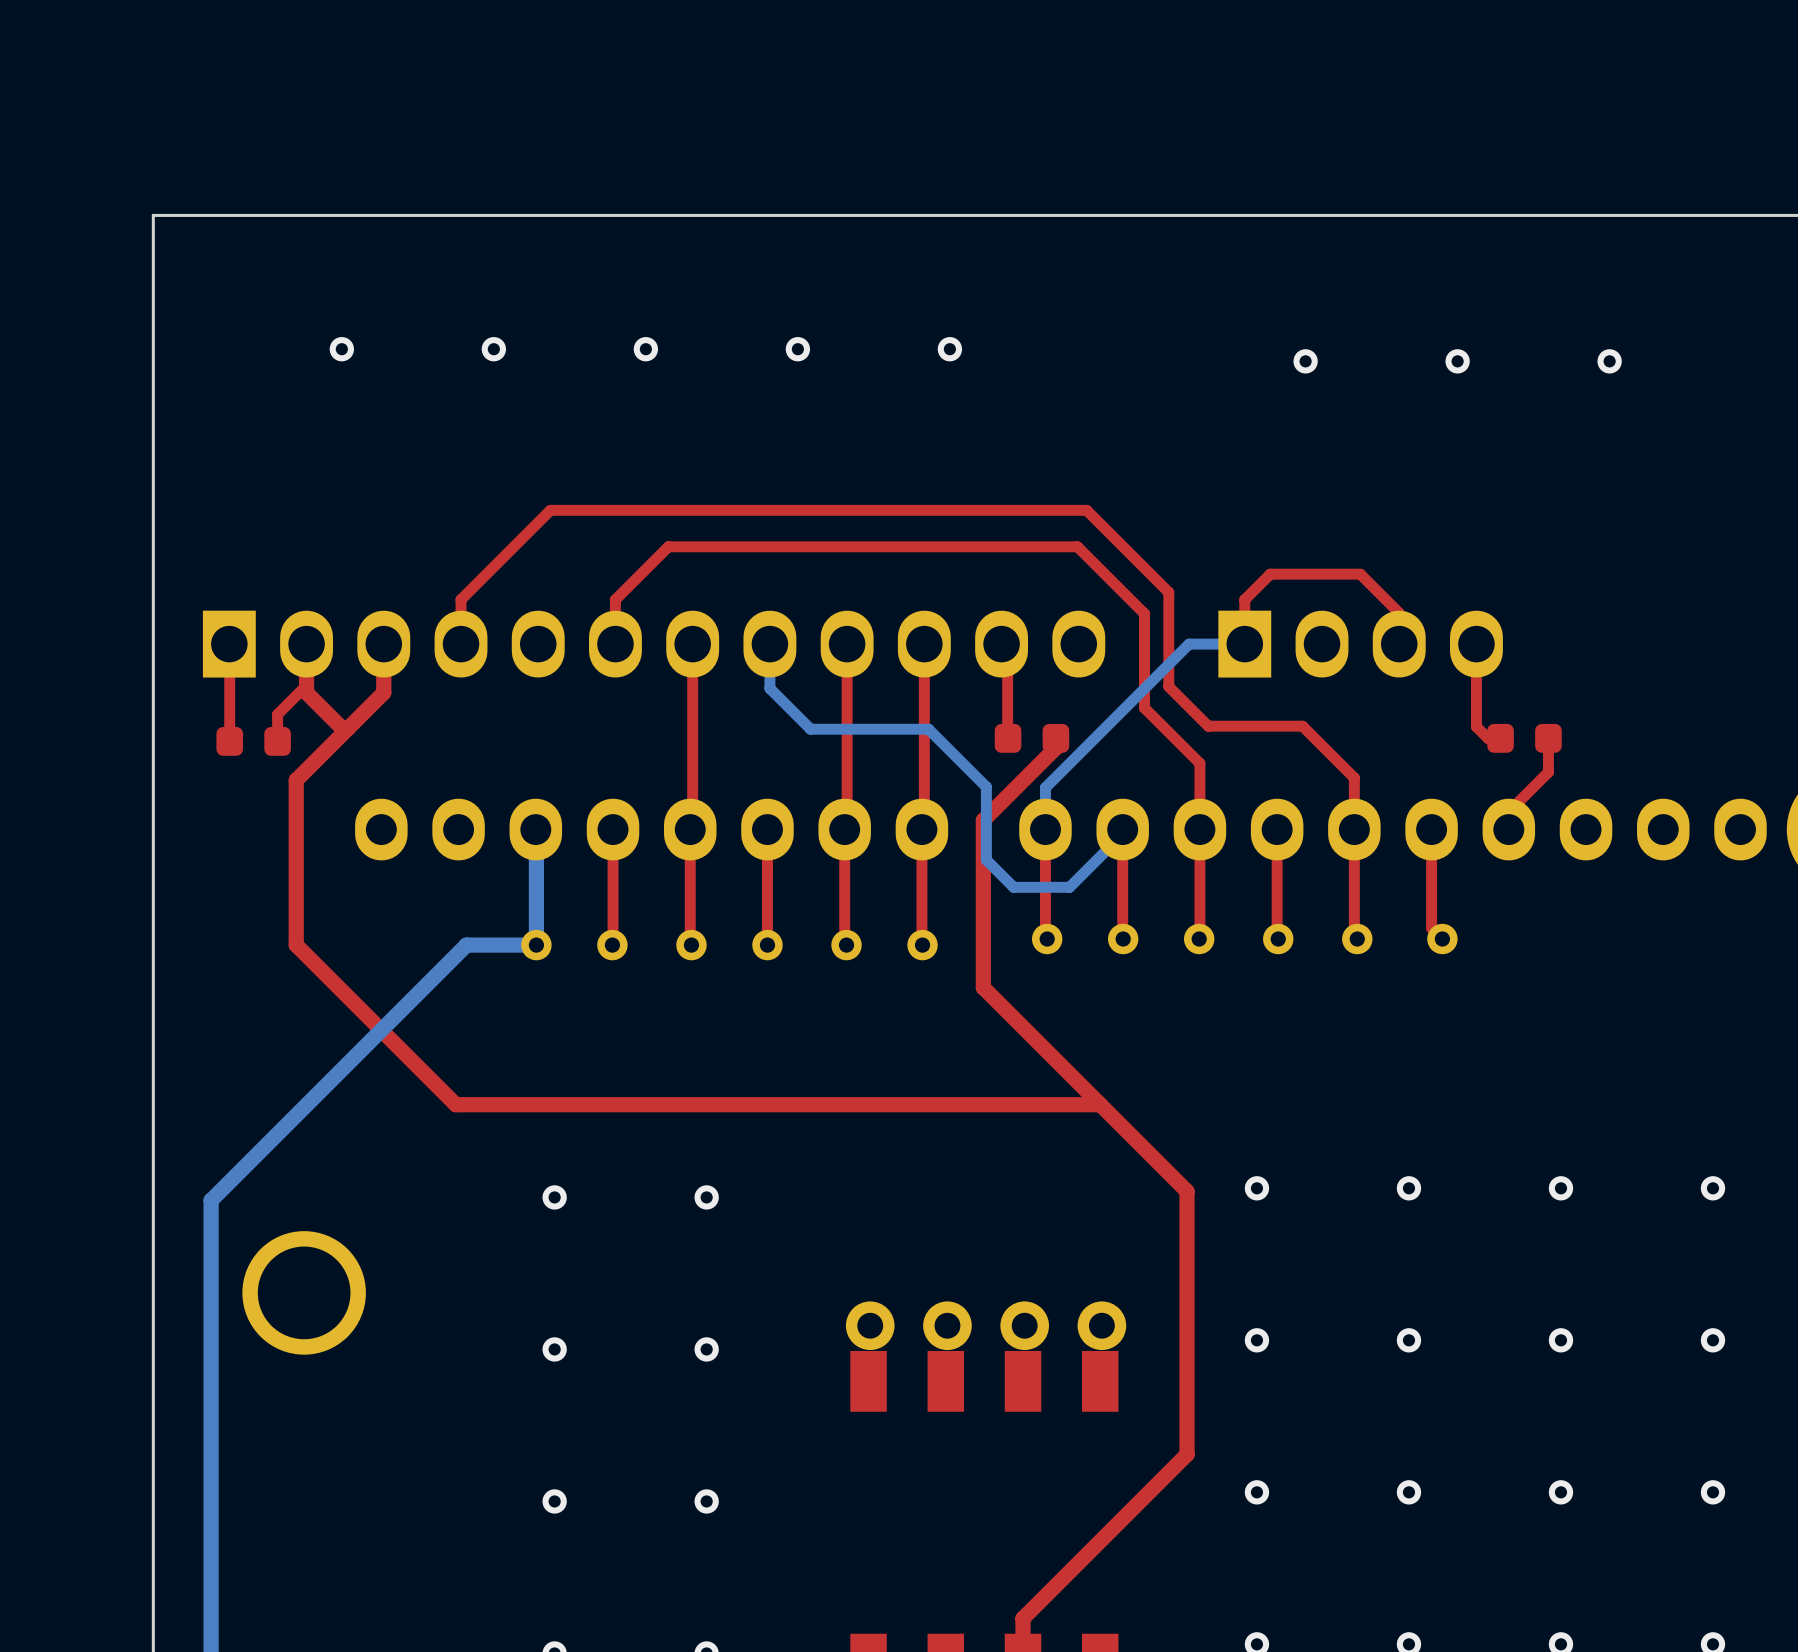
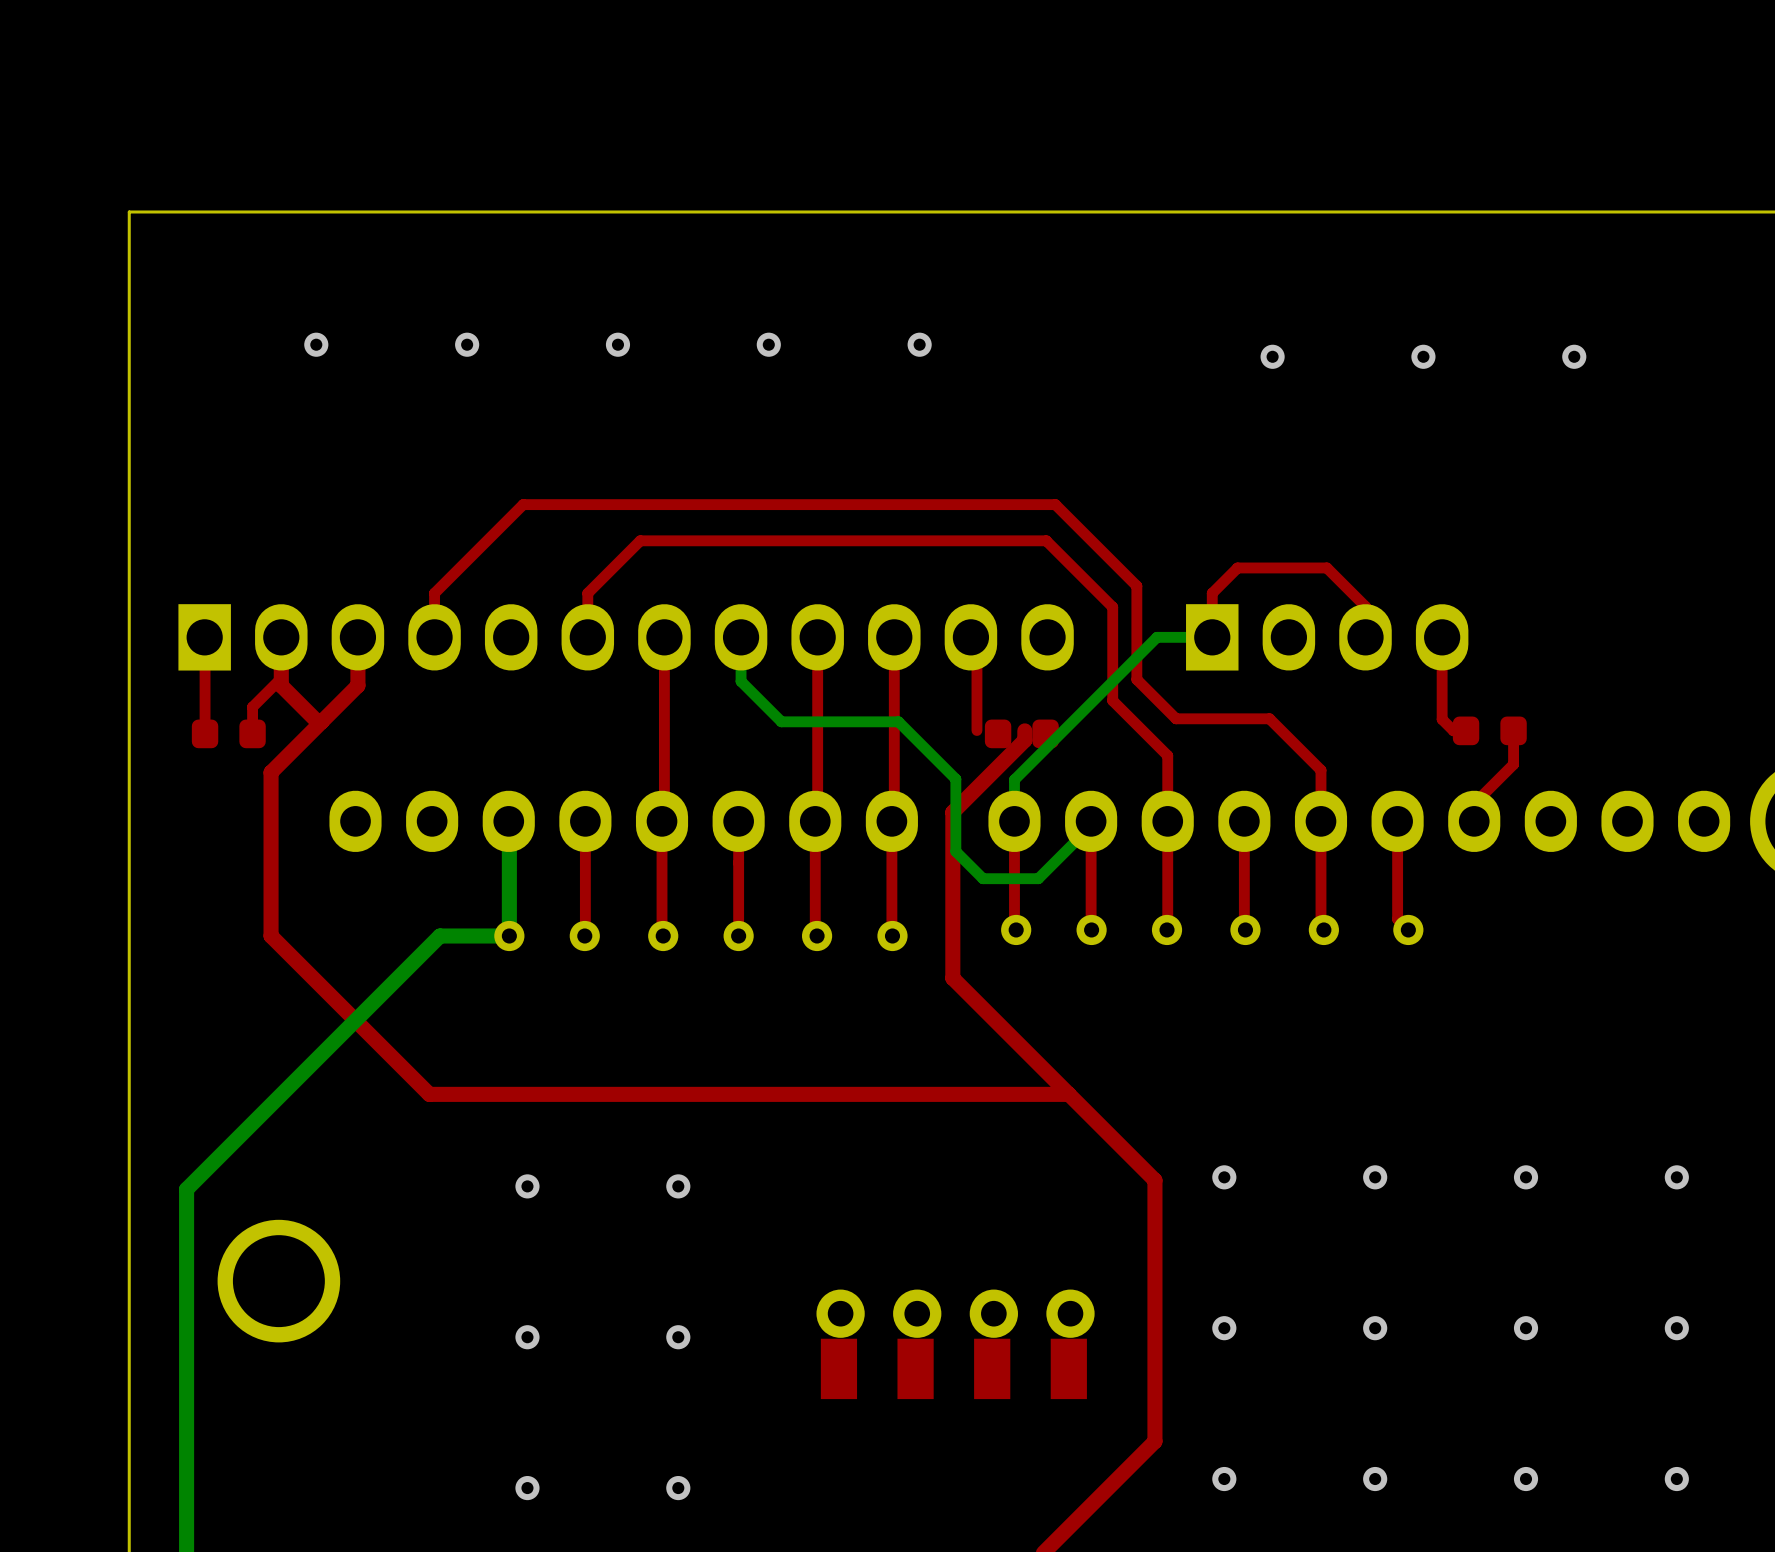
part position: (1031, 738) -> (1021, 733)

